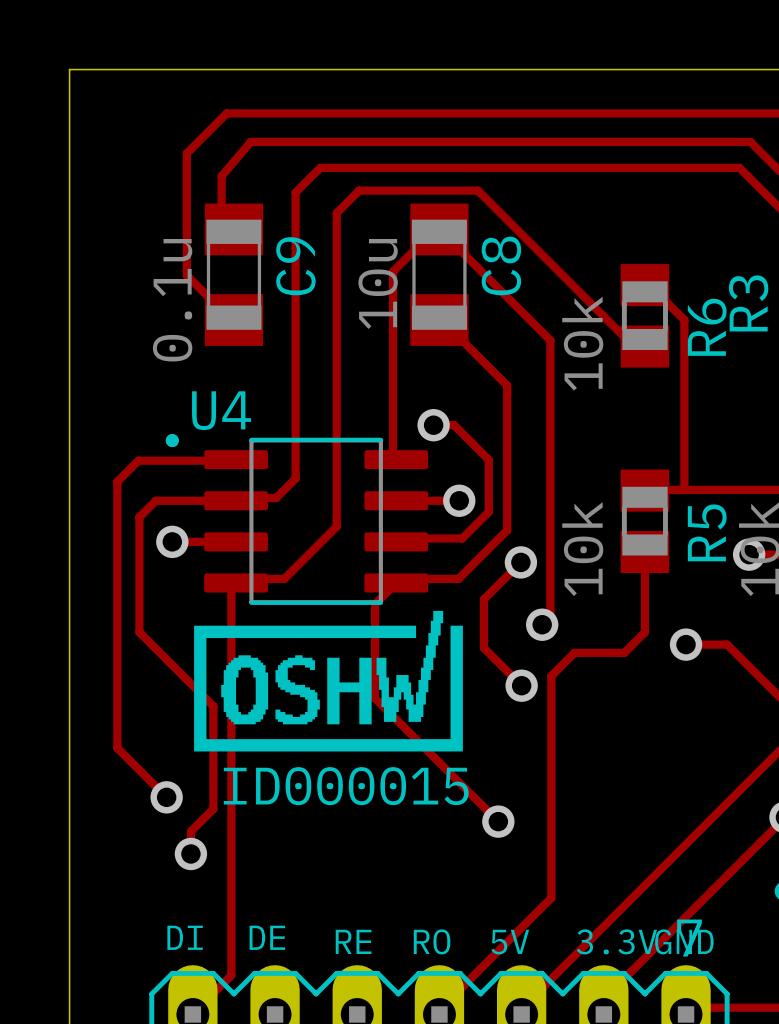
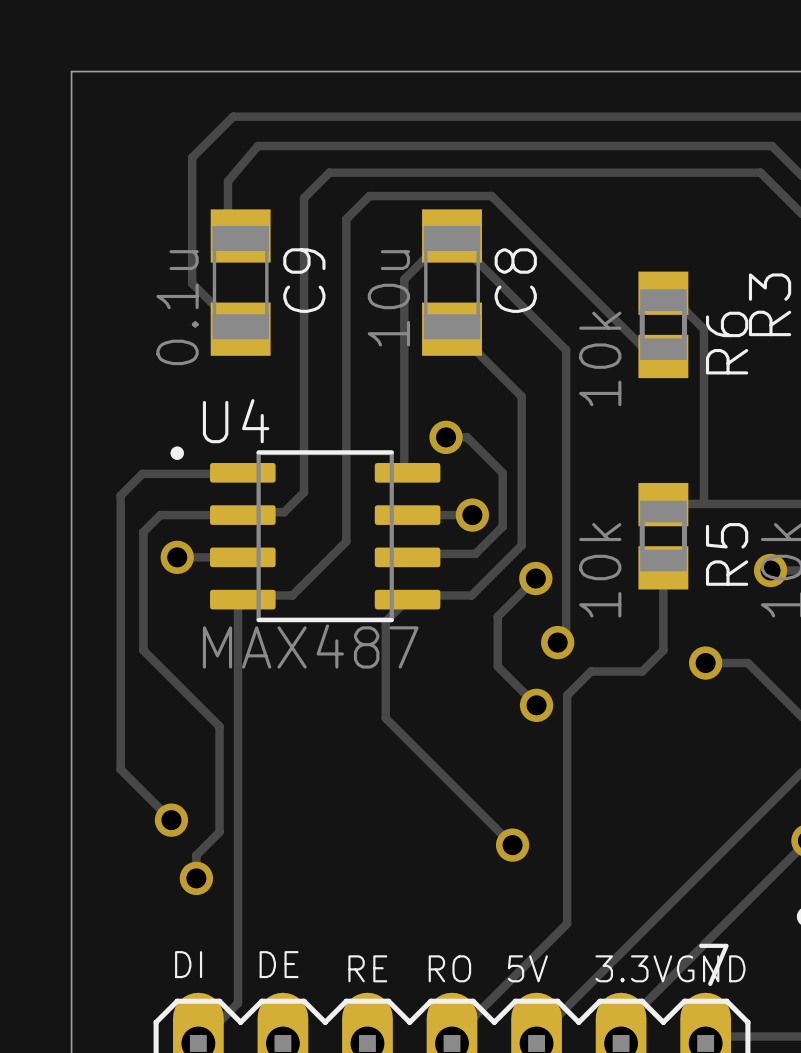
drawing: [194, 610, 463, 752] -> none
U4 value: none -> MAX487 (310, 646)

